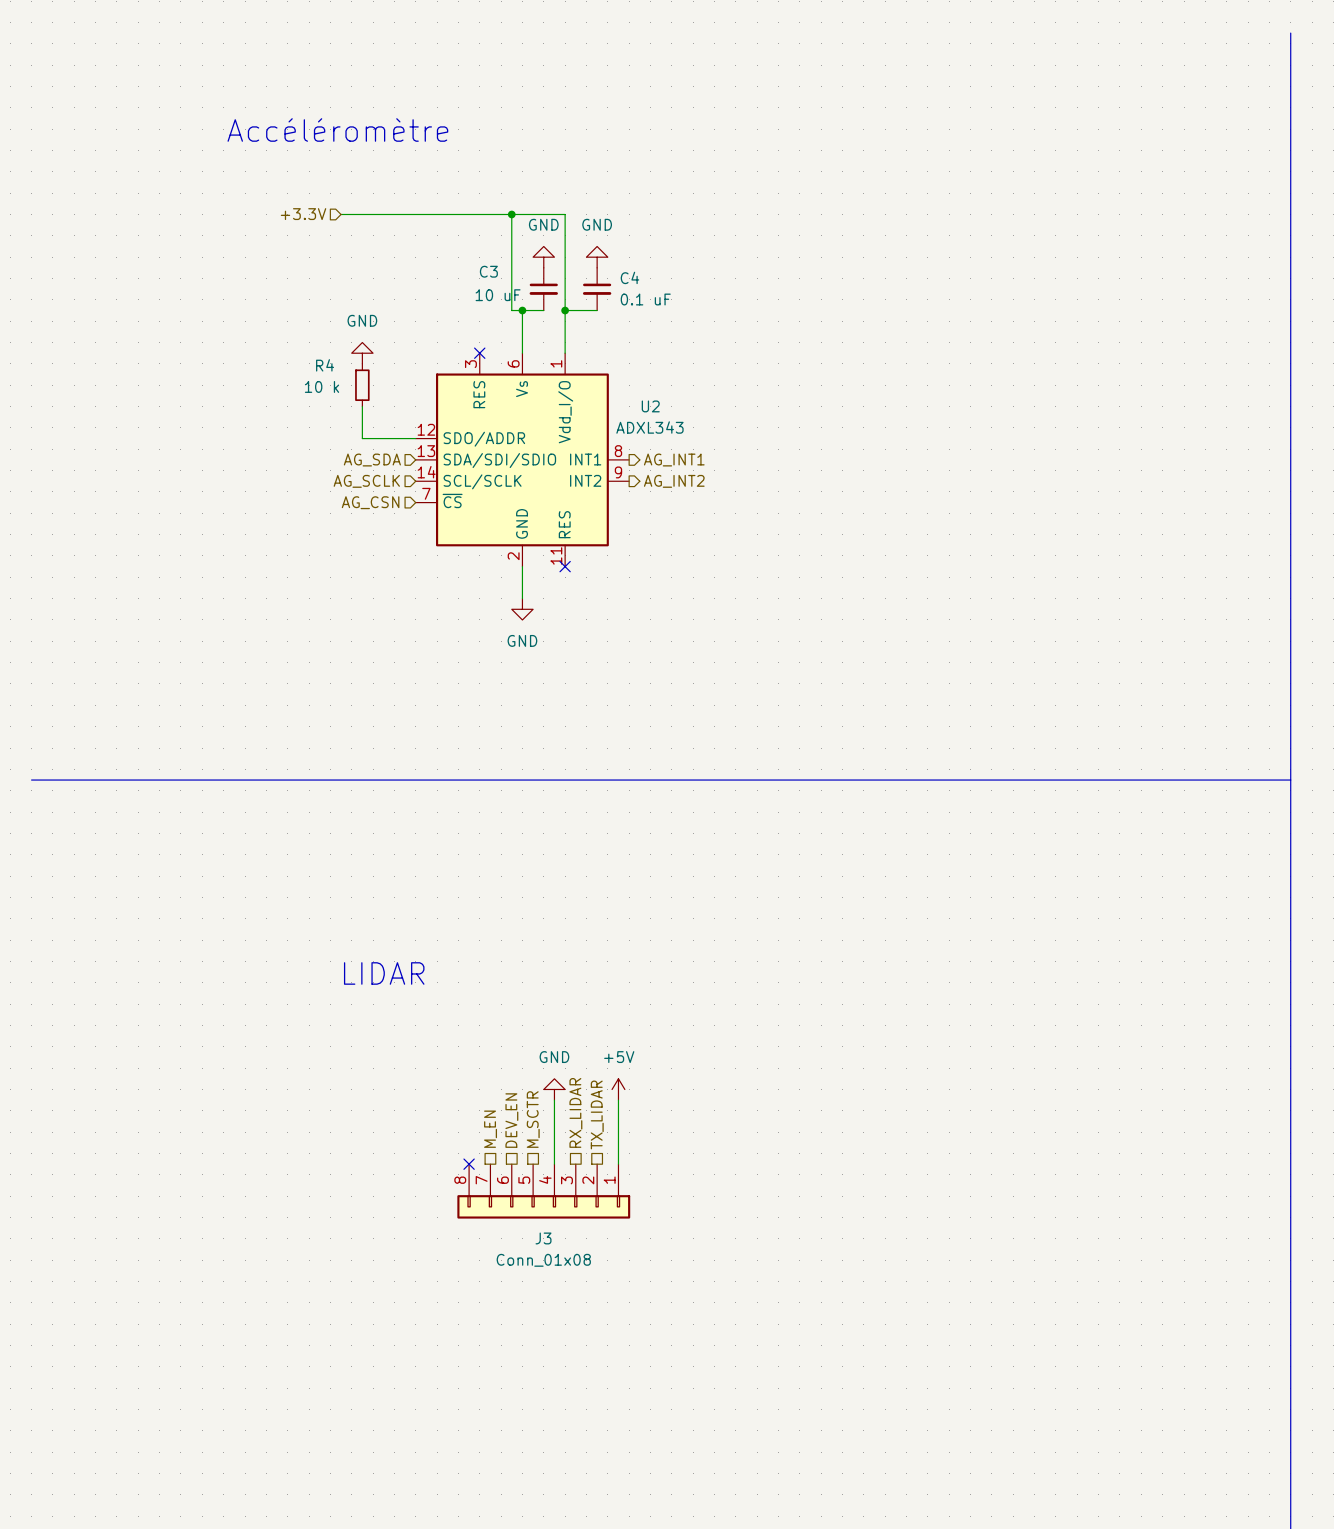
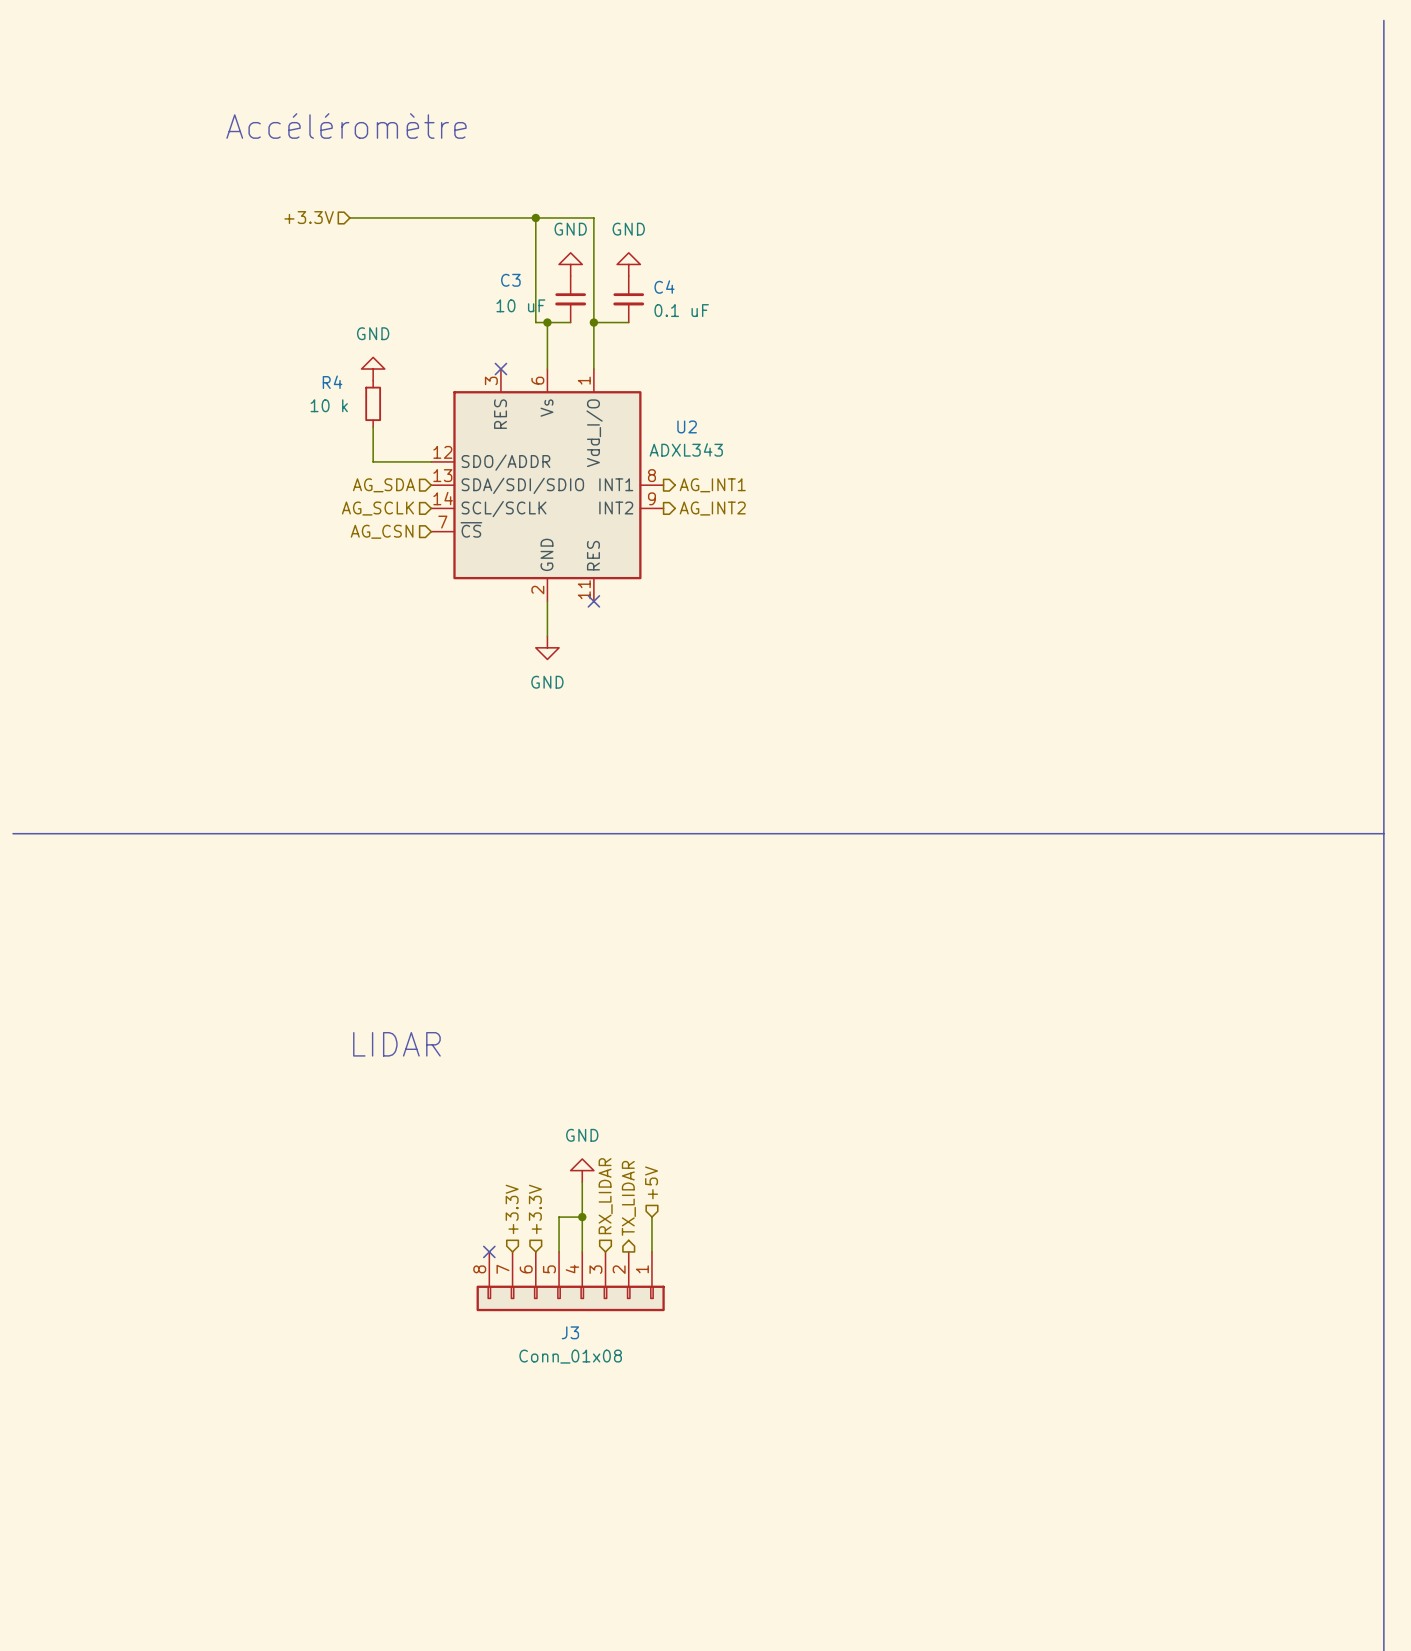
power symbol: +5V (618, 1089) -> none
wire: (618, 1100) (618, 1132) -> none
hierarchical label: none -> +5V (651, 1182)
hierarchical label shape: passive (575, 1112) -> input (605, 1196)
hierarchical label shape: passive (597, 1114) -> output (628, 1198)
hierarchical label: M_SCTR (533, 1119) -> none
hierarchical label shape: passive (511, 1120) -> input (535, 1209)
hierarchical label: DEV_EN (511, 1120) -> +3.3V (535, 1209)
hierarchical label shape: passive (490, 1129) -> input (512, 1209)
hierarchical label: M_EN (490, 1129) -> +3.3V (512, 1209)
wire: none -> (582, 1217) (559, 1217) (559, 1251)
junction: none -> (582, 1217)

